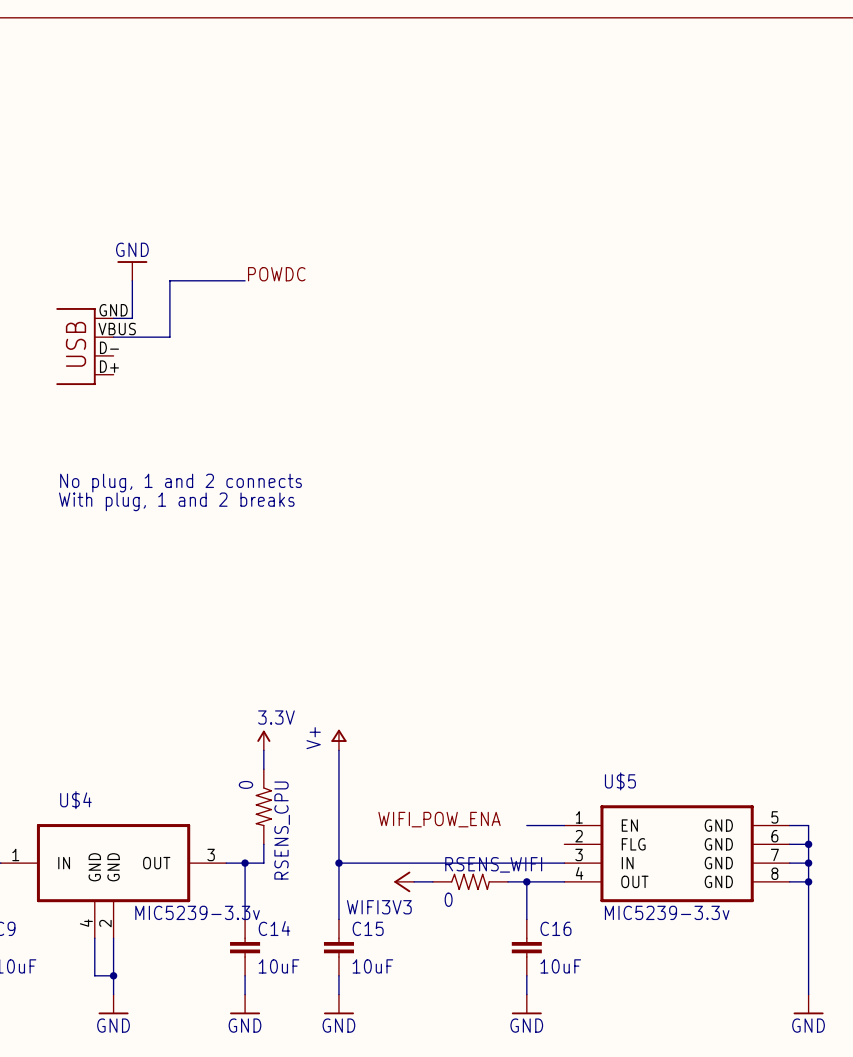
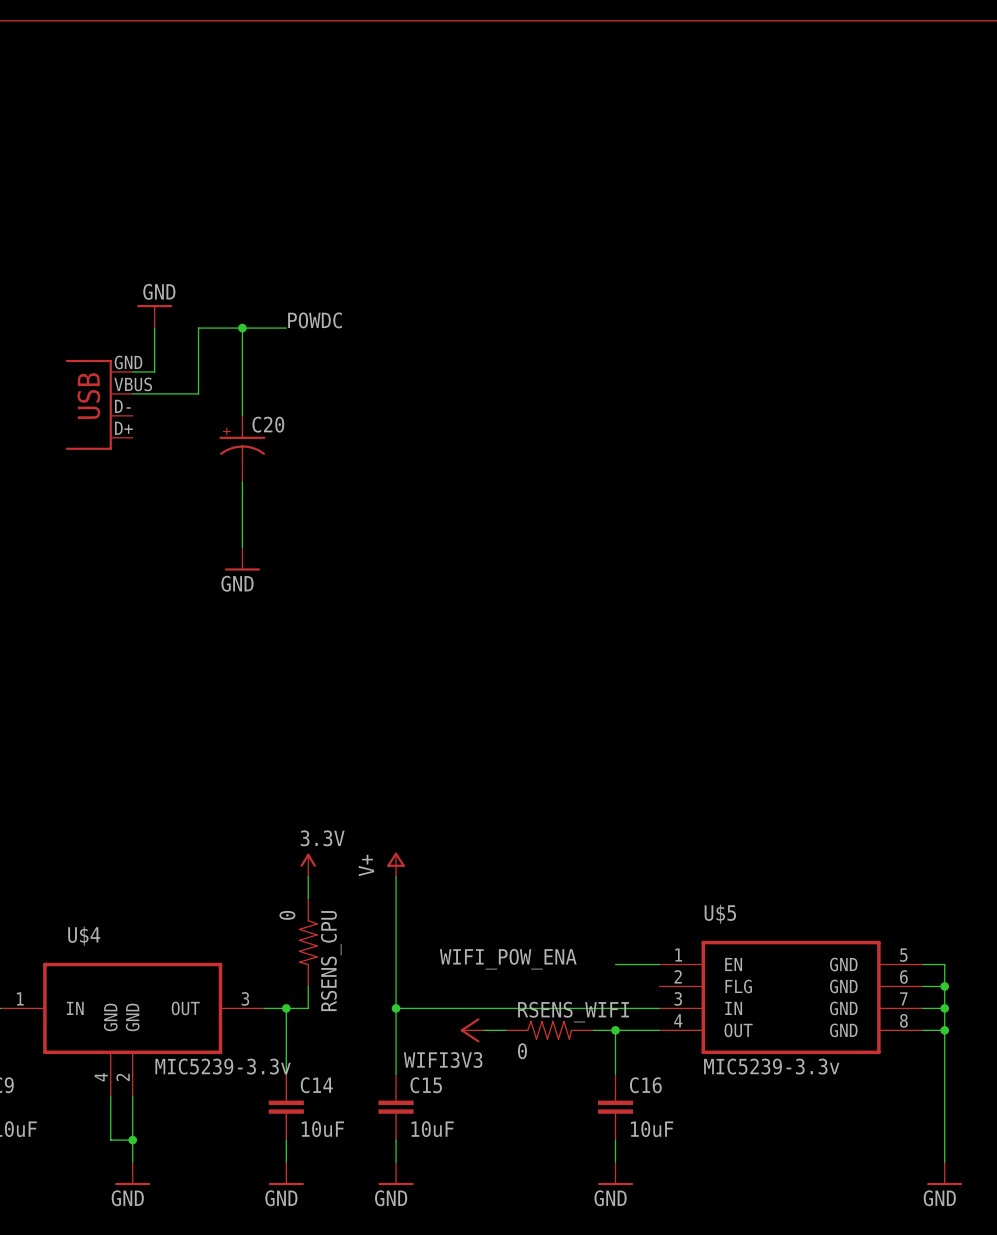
wire: none -> (242, 328) (242, 415)
junction: none -> (242, 328)
C20: none -> (242, 448)
wire: none -> (242, 481) (242, 547)
power symbol: none -> GND (242, 559)
text: No plug, 1 and 2 connects (181, 483) -> none
text: With plug, 1 and 2 breaks (176, 501) -> none

